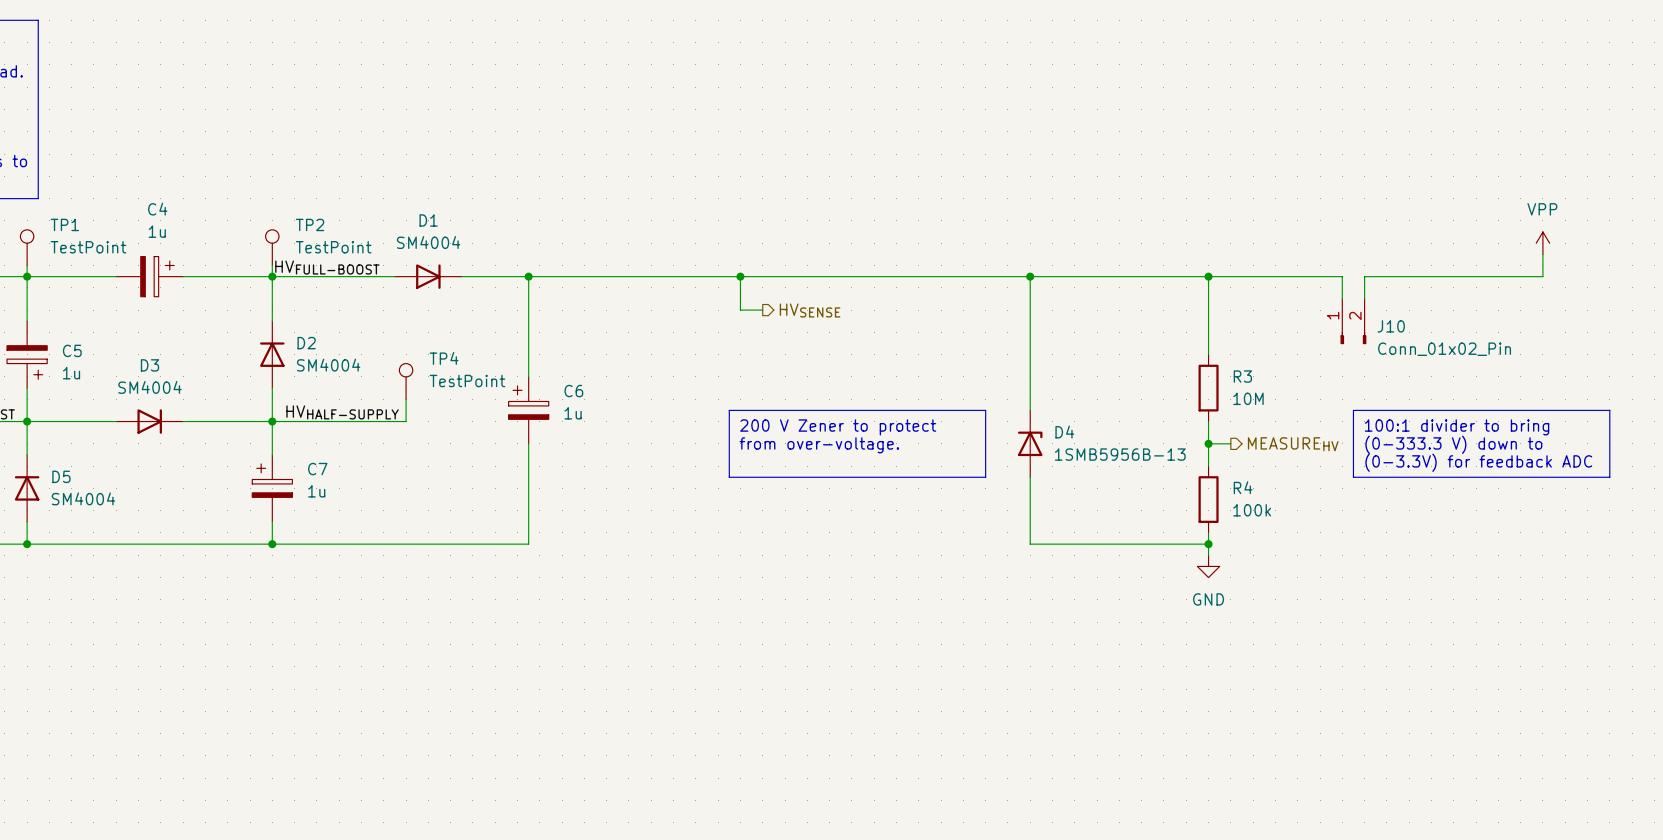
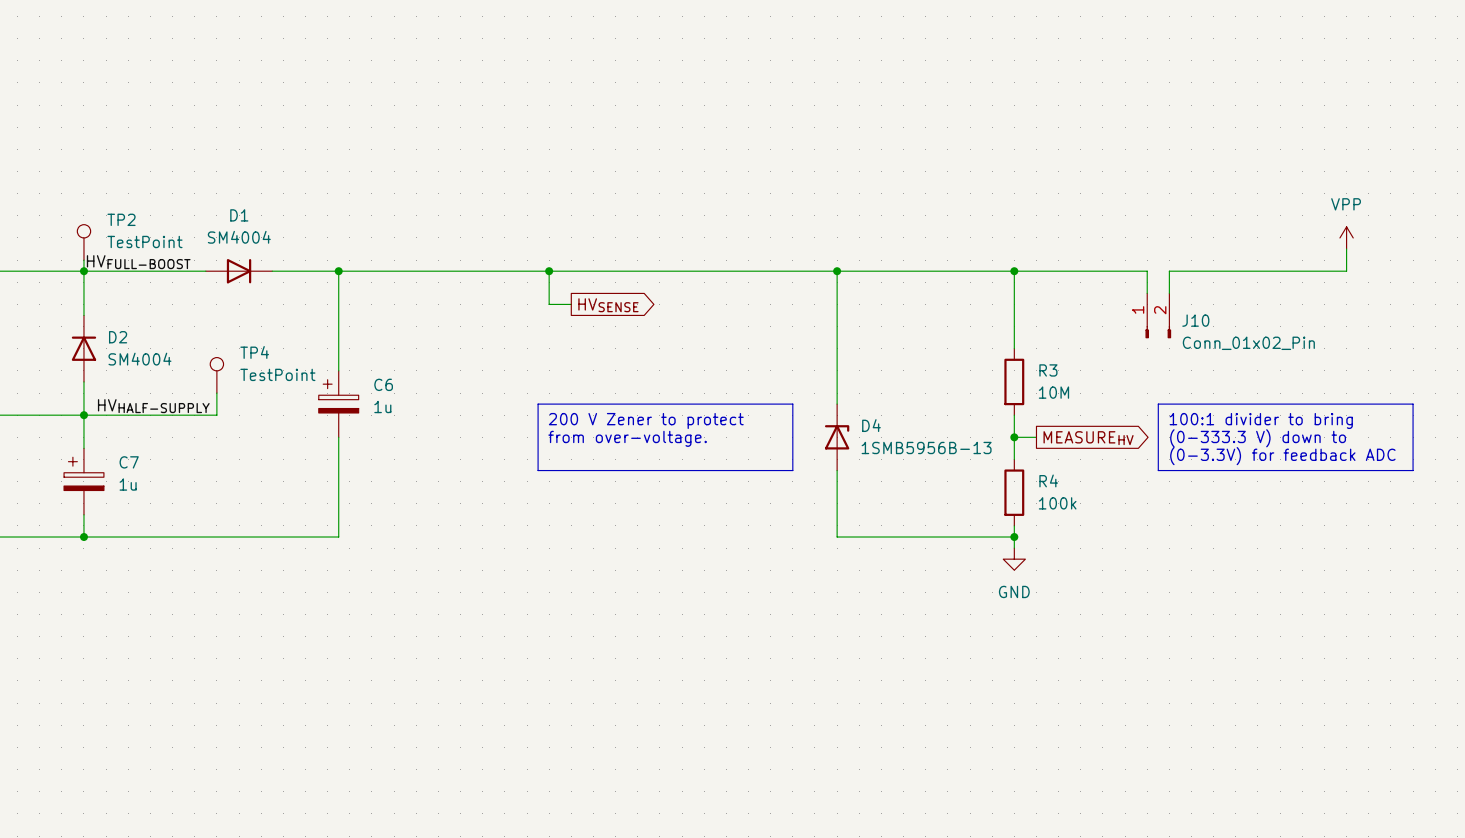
global label: none -> HVSENSE (608, 305)
hierarchical label: HVSENSE (810, 310) -> none
global label: none -> MEASUREHV (1088, 438)
hierarchical label: MEASUREHV (1293, 444) -> none

